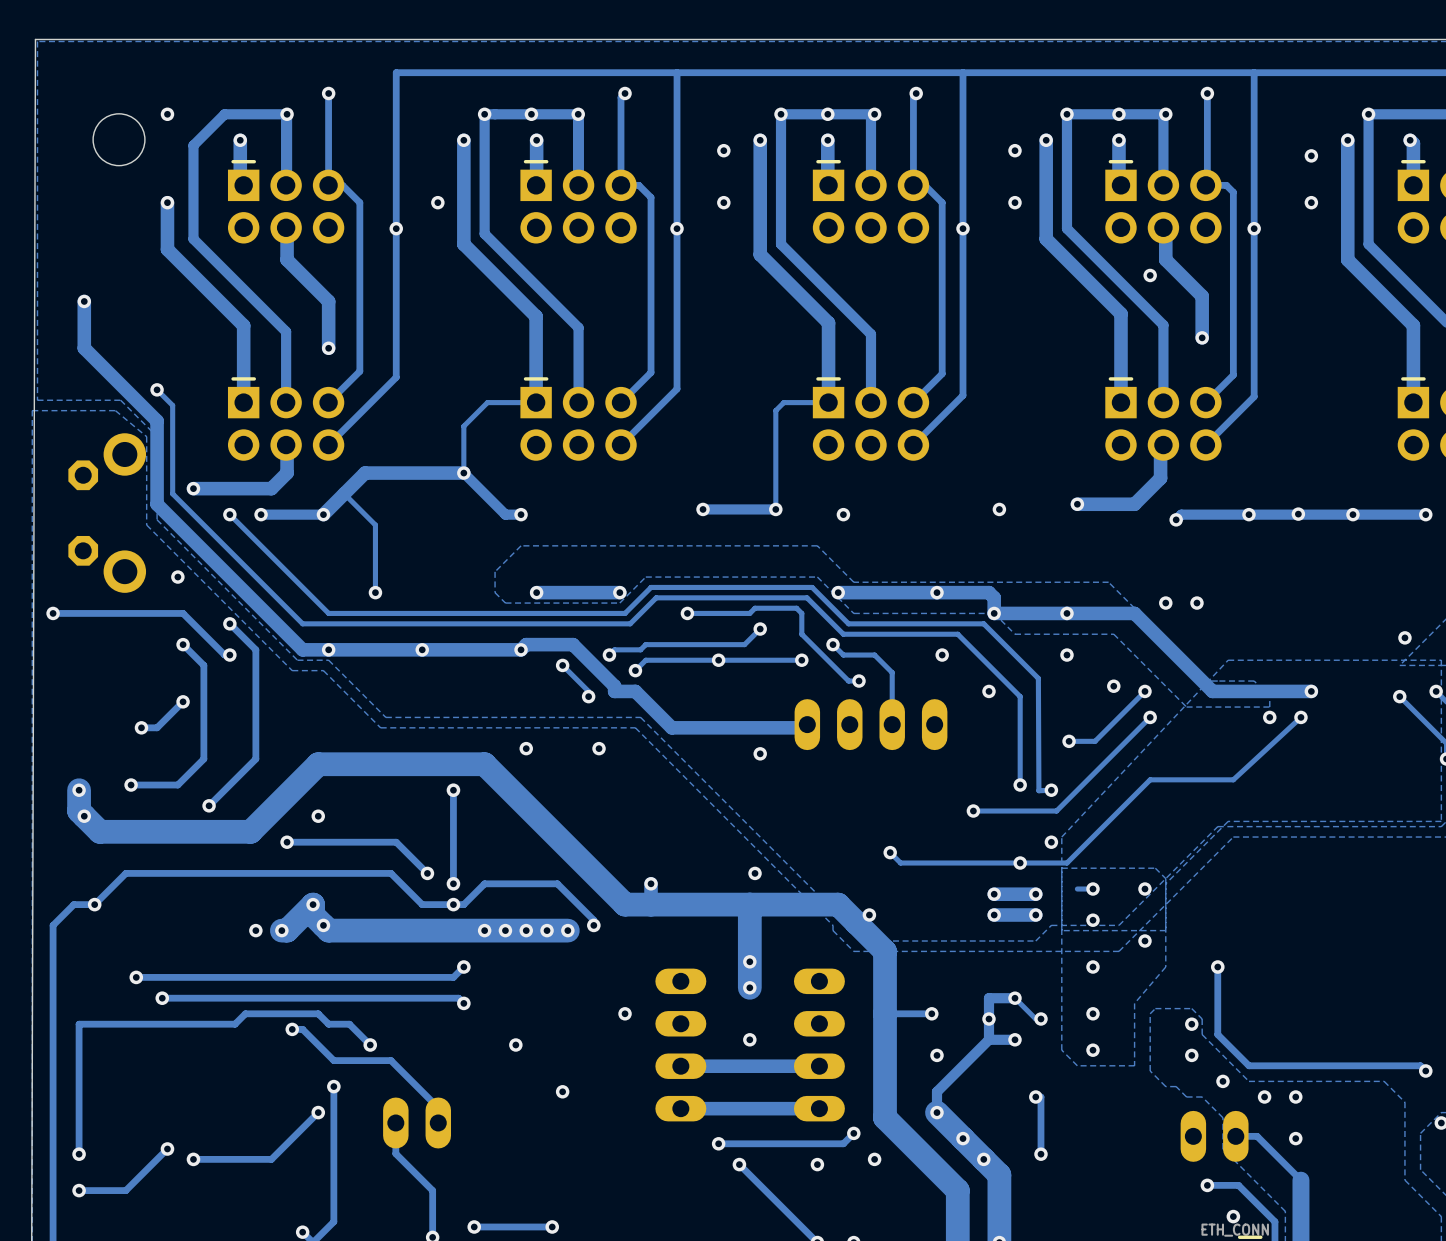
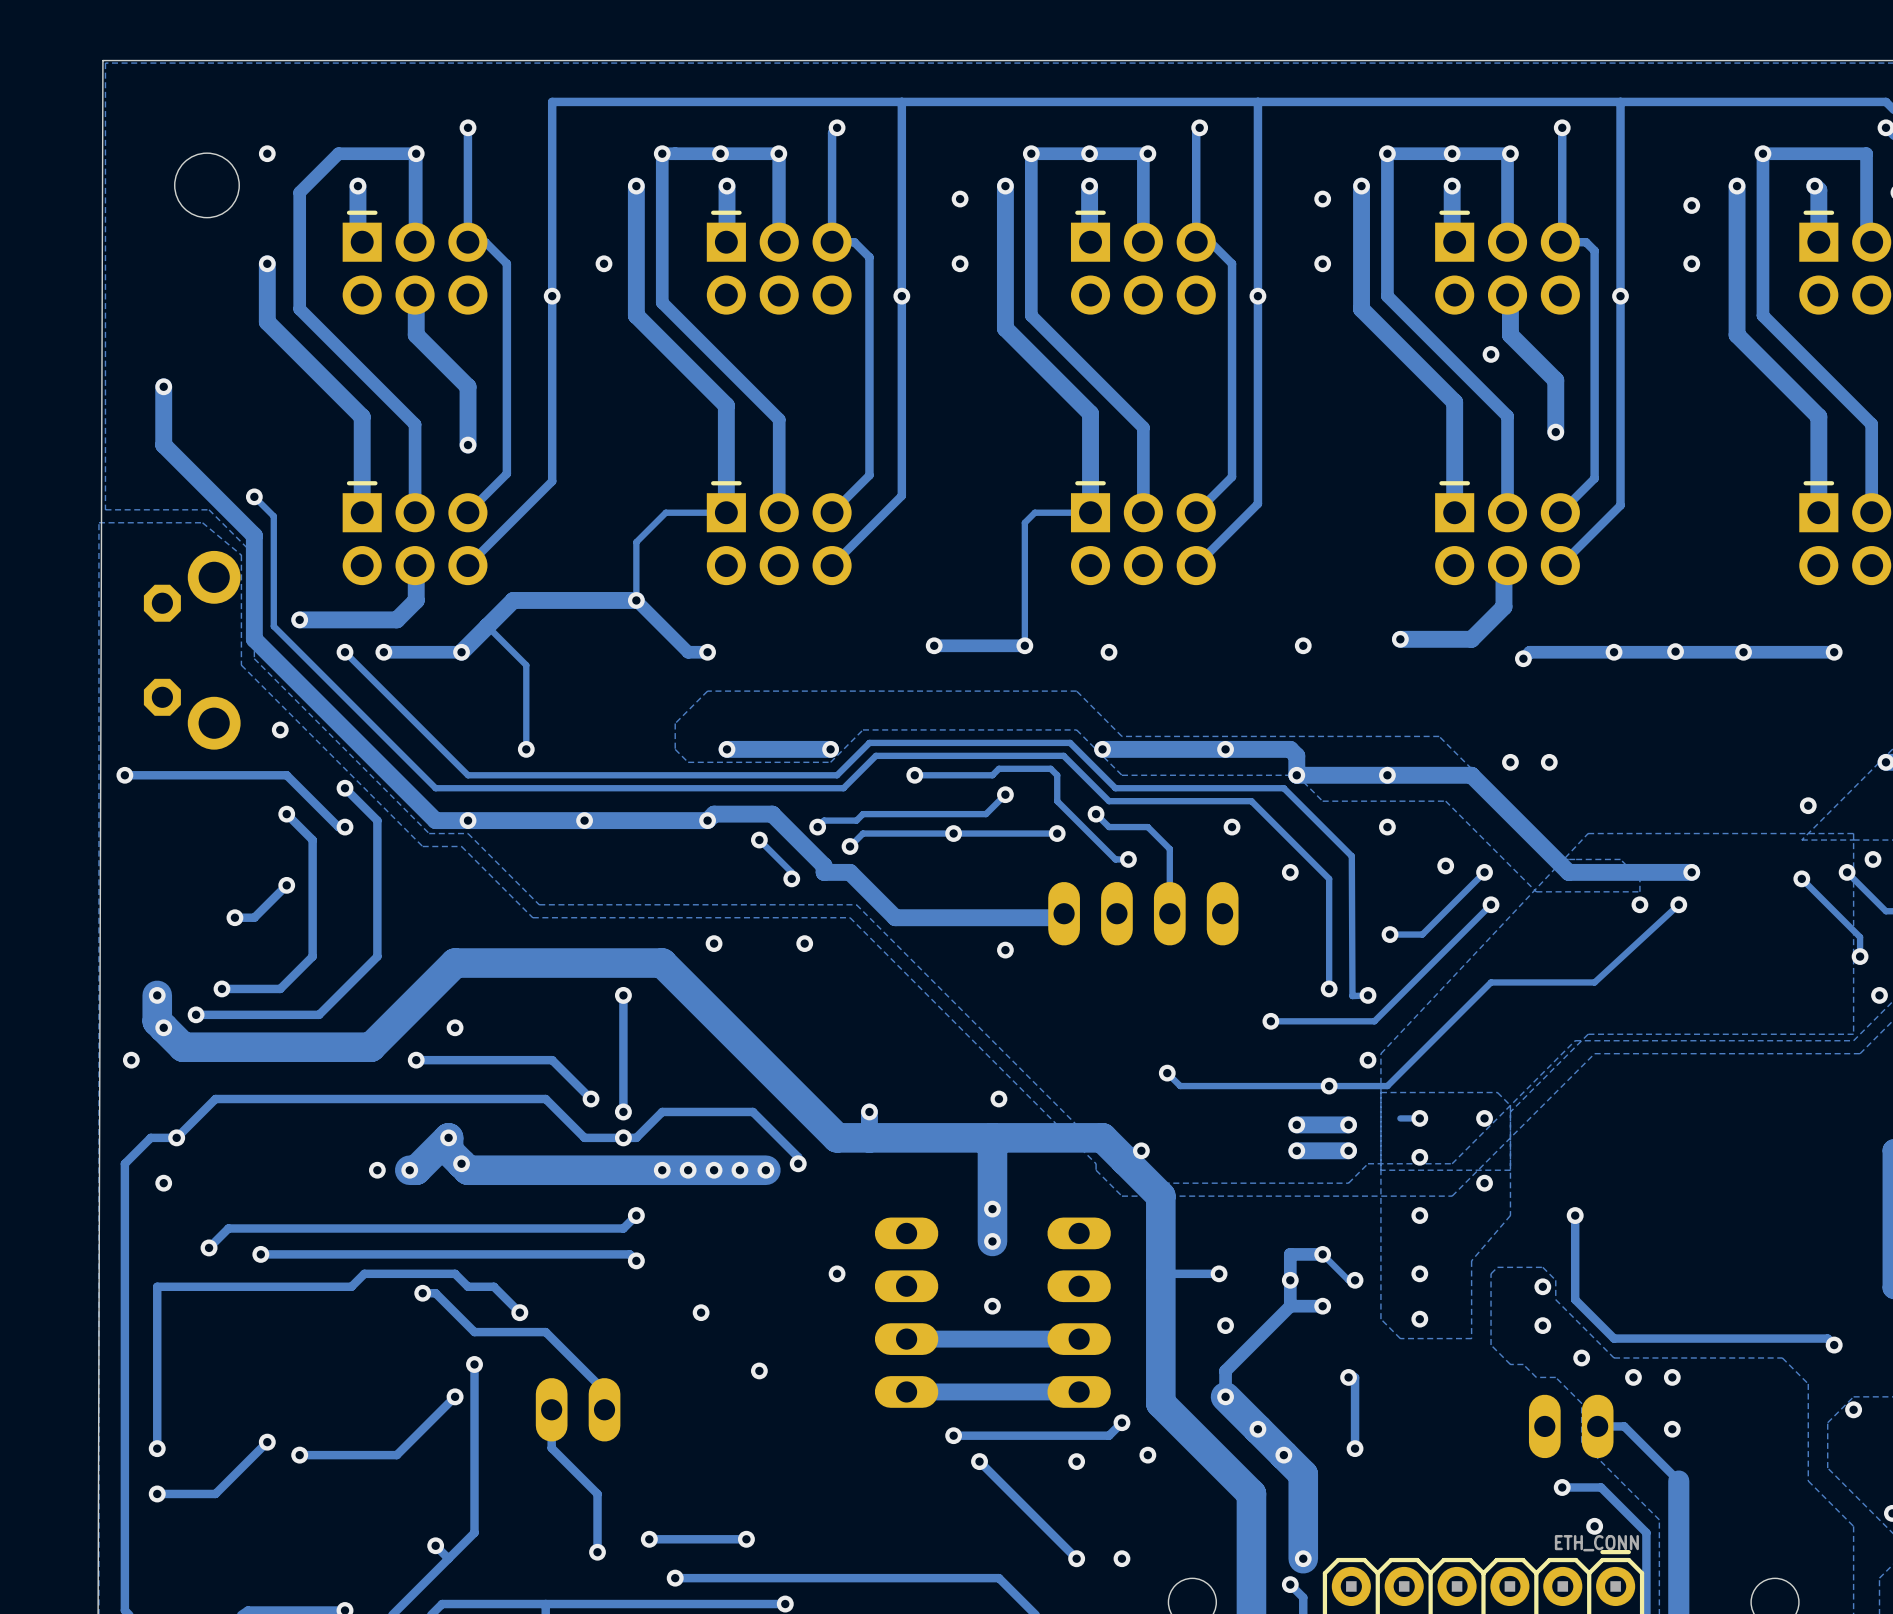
via: none -> (196, 1014)
track: none -> (319, 1014) (196, 1014)
via: (209, 805) -> none
via: none -> (131, 1060)
via: none -> (163, 1183)
track: none -> (228, 1228) (209, 1247)
via position: (136, 977) -> (209, 1247)

